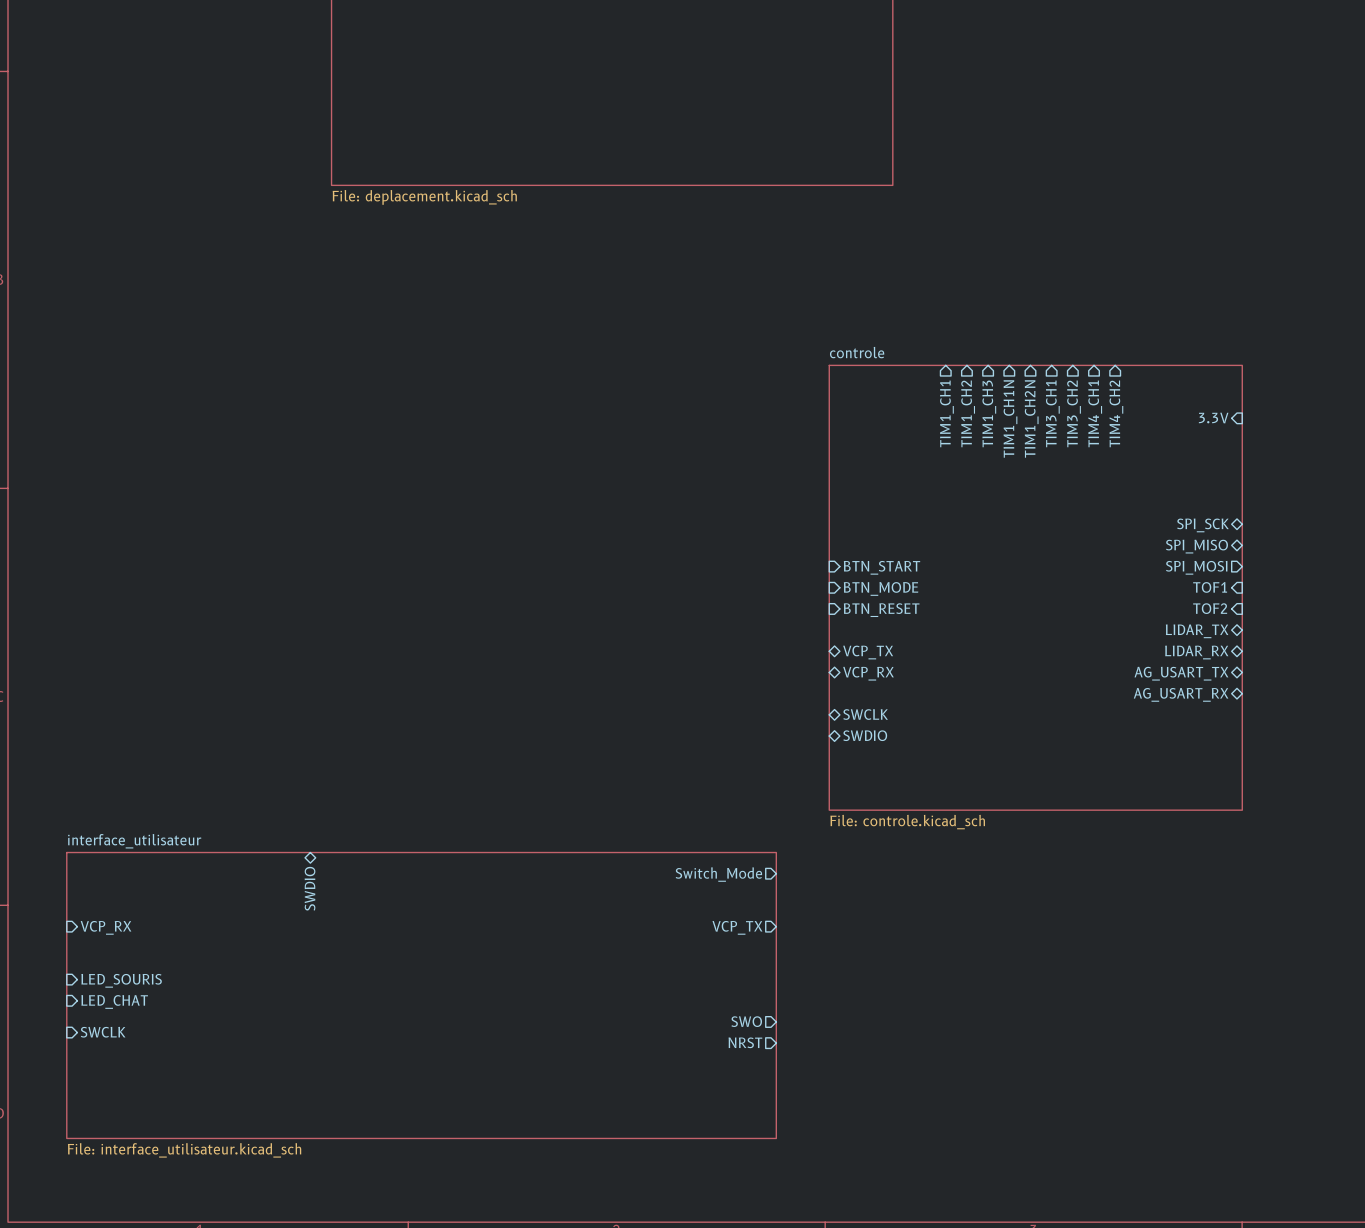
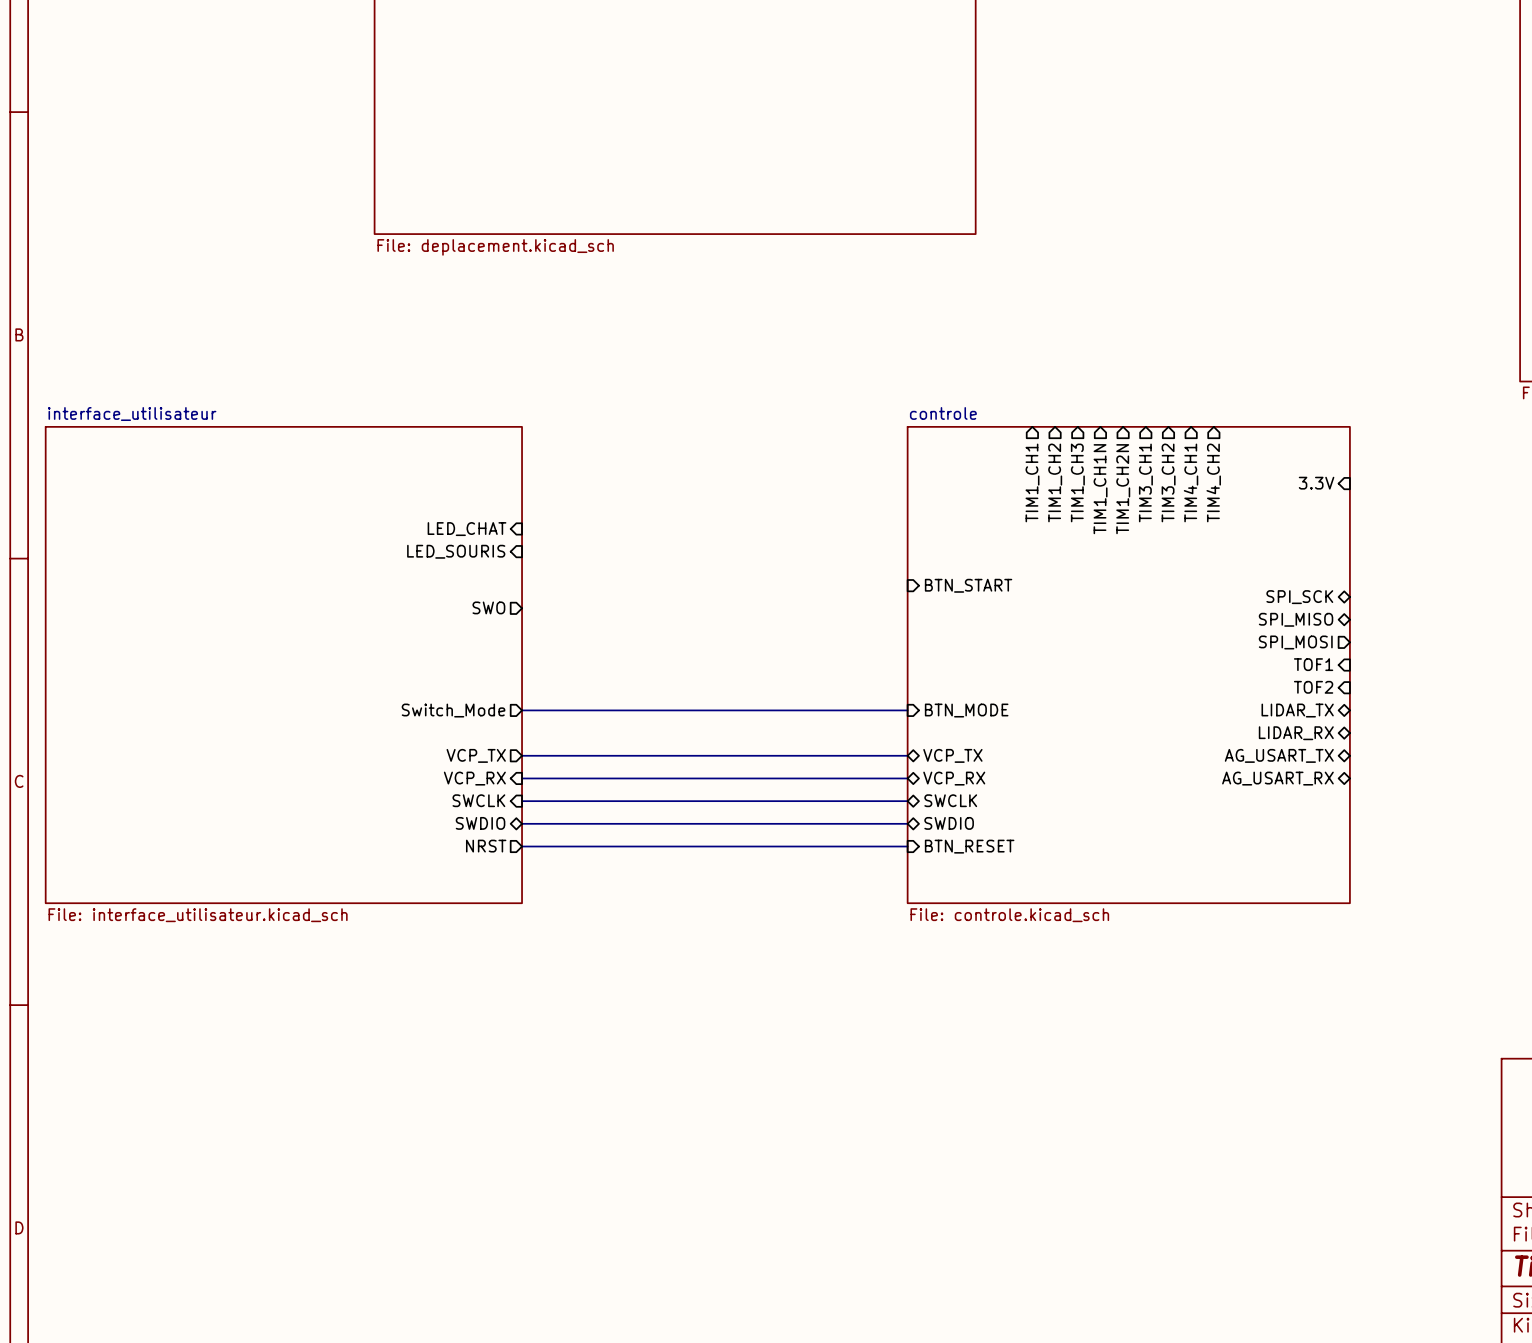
sheet pin: none -> LED_CHAT (467, 529)
sheet pin: none -> LED_SOURIS (456, 551)
sheet pin: none -> SWO (488, 607)
sheet pin position: BTN_START (881, 567) -> BTN_START (968, 585)
sheet interface_utilisateur: none -> File: interface_utilisateur.kicad_sch (283, 665)
sheet pin position: BTN_MODE (881, 588) -> BTN_MODE (966, 710)
sheet pin position: BTN_RESET (881, 610) -> BTN_RESET (969, 846)
sheet pin: none -> Switch_Mode (453, 710)
wire: none -> (522, 710) (907, 710)
sheet pin: VCP_TX (868, 652) -> none
wire: none -> (522, 755) (907, 755)
sheet pin: none -> VCP_TX (476, 755)
sheet pin: VCP_RX (868, 673) -> VCP_TX (952, 755)
wire: none -> (522, 778) (907, 778)
sheet pin: none -> VCP_RX (474, 778)
sheet pin: none -> VCP_RX (954, 778)
sheet pin: none -> SWCLK (478, 800)
wire: none -> (522, 801) (907, 801)
wire: none -> (522, 823) (907, 823)
sheet pin: none -> NRST (486, 846)
wire: none -> (522, 846) (907, 846)
sheet pin: Switch_Mode (718, 874) -> none
sheet pin rotation: 0° (310, 888) -> 90° clockwise (480, 823)
sheet pin position: SWDIO (310, 888) -> SWDIO (480, 823)
sheet pin: VCP_RX (106, 927) -> none
sheet pin: VCP_TX (737, 927) -> none
sheet pin: LED_SOURIS (121, 980) -> none
sheet interface_utilisateur: File: interface_utilisateur.kicad_sch (421, 995) -> none
sheet pin: LED_CHAT (114, 1001) -> none
sheet pin: SWO (746, 1021) -> none
sheet pin: SWCLK (103, 1032) -> none
sheet pin: NRST (745, 1042) -> none

